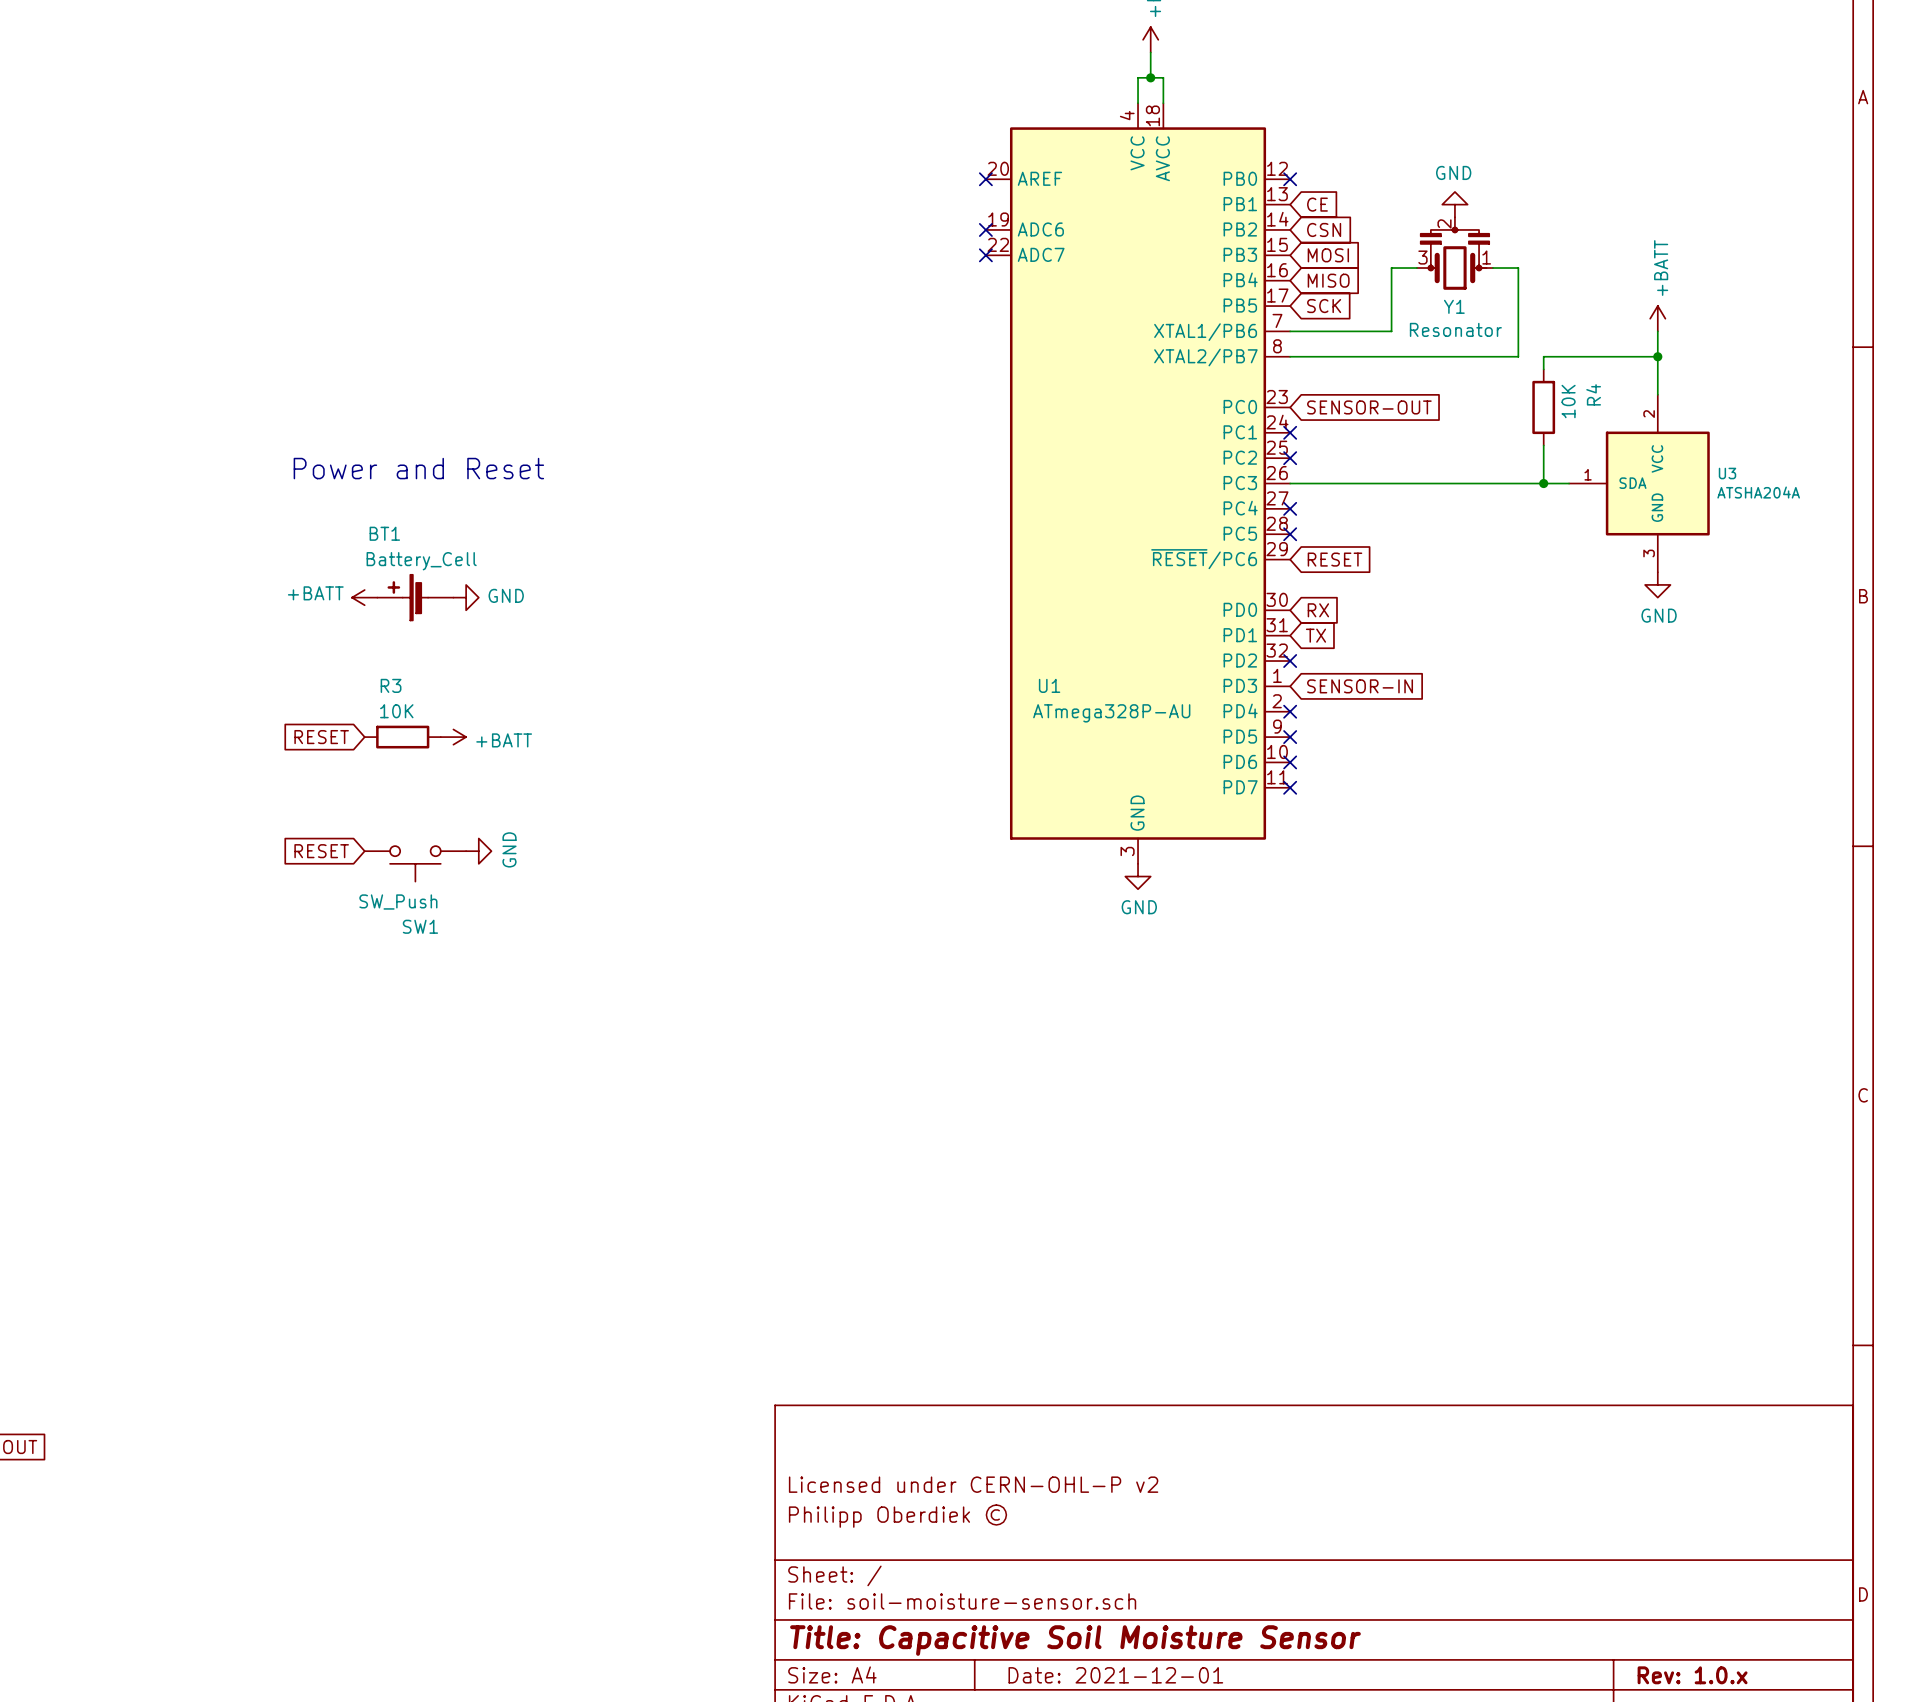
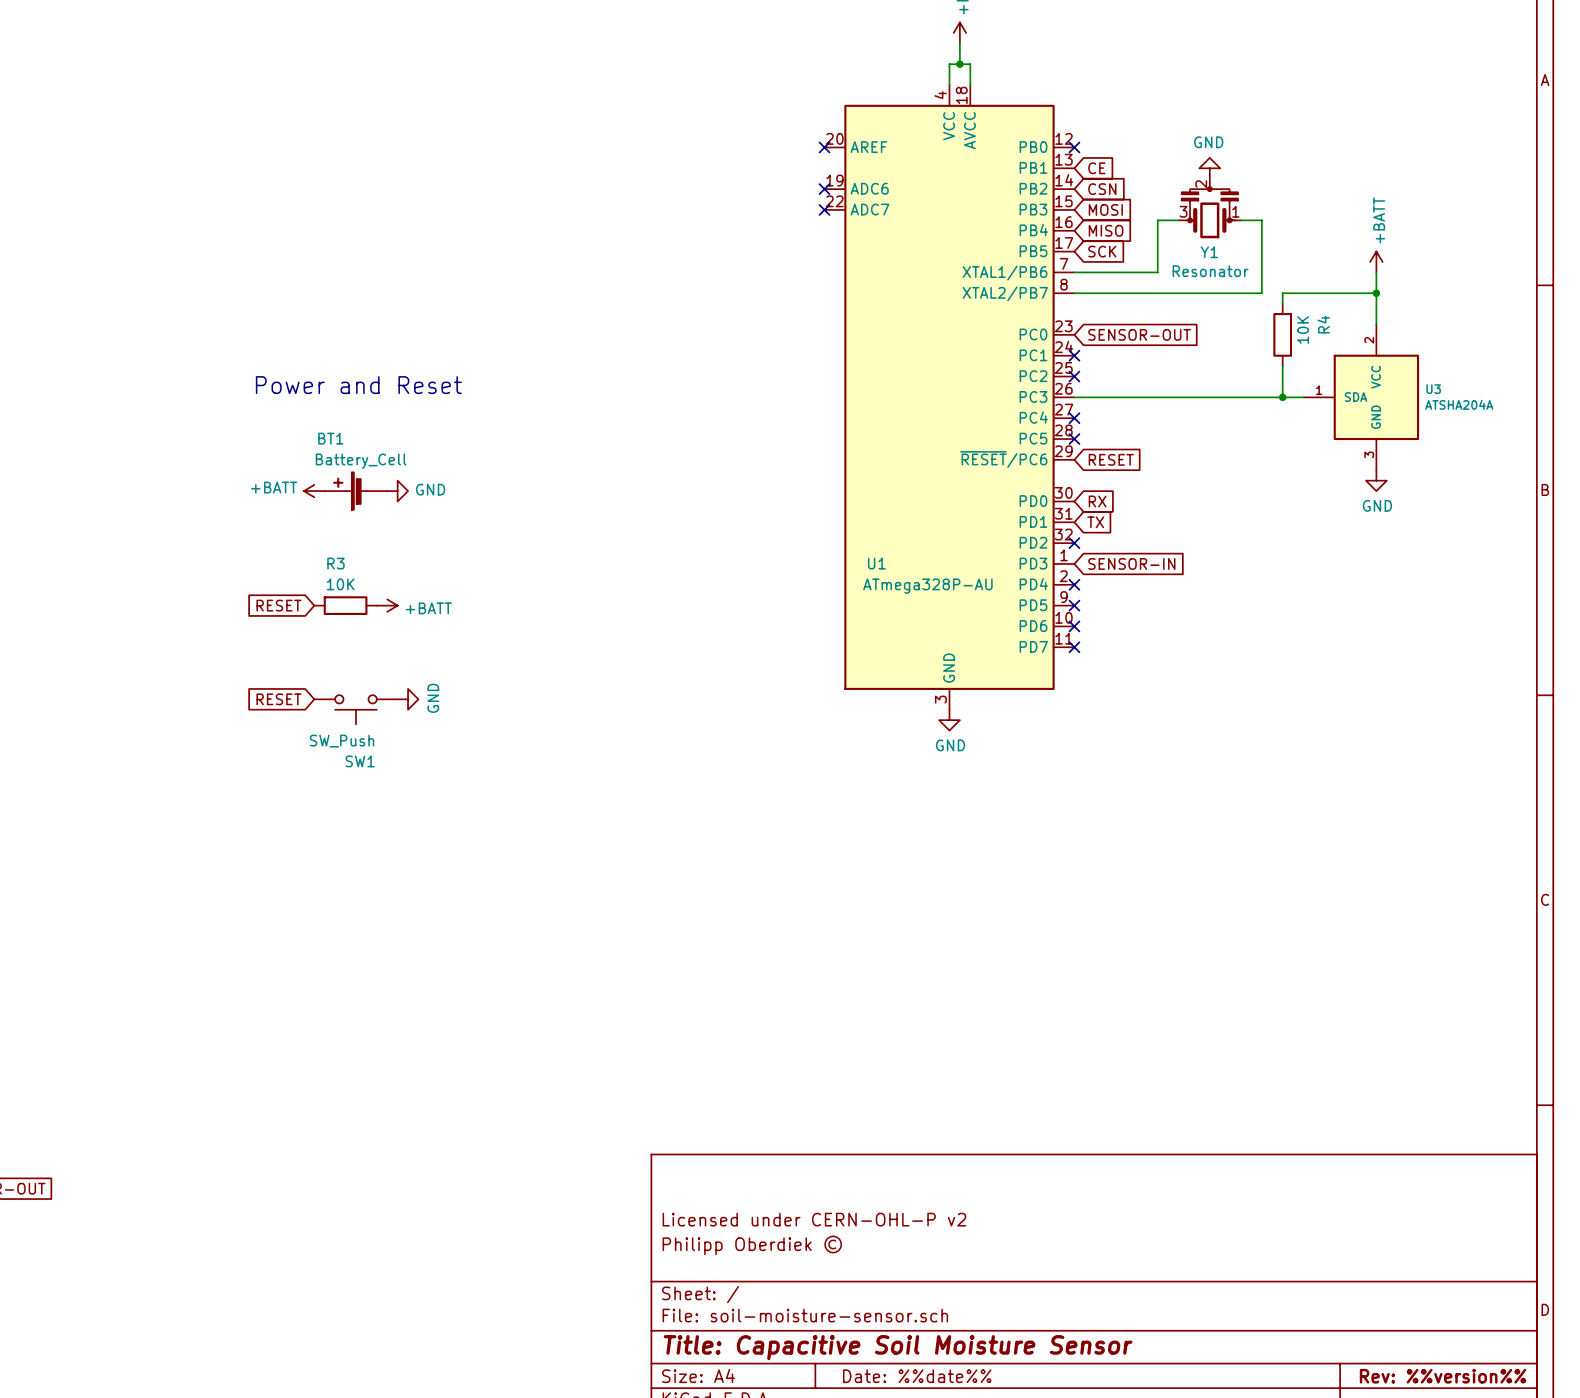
title block: Date: 2021-12-01 (1115, 1675) -> Date: %%date%% (917, 1376)
title block: Rev: 1.0.x (1692, 1675) -> Rev: %%version%% (1443, 1376)

